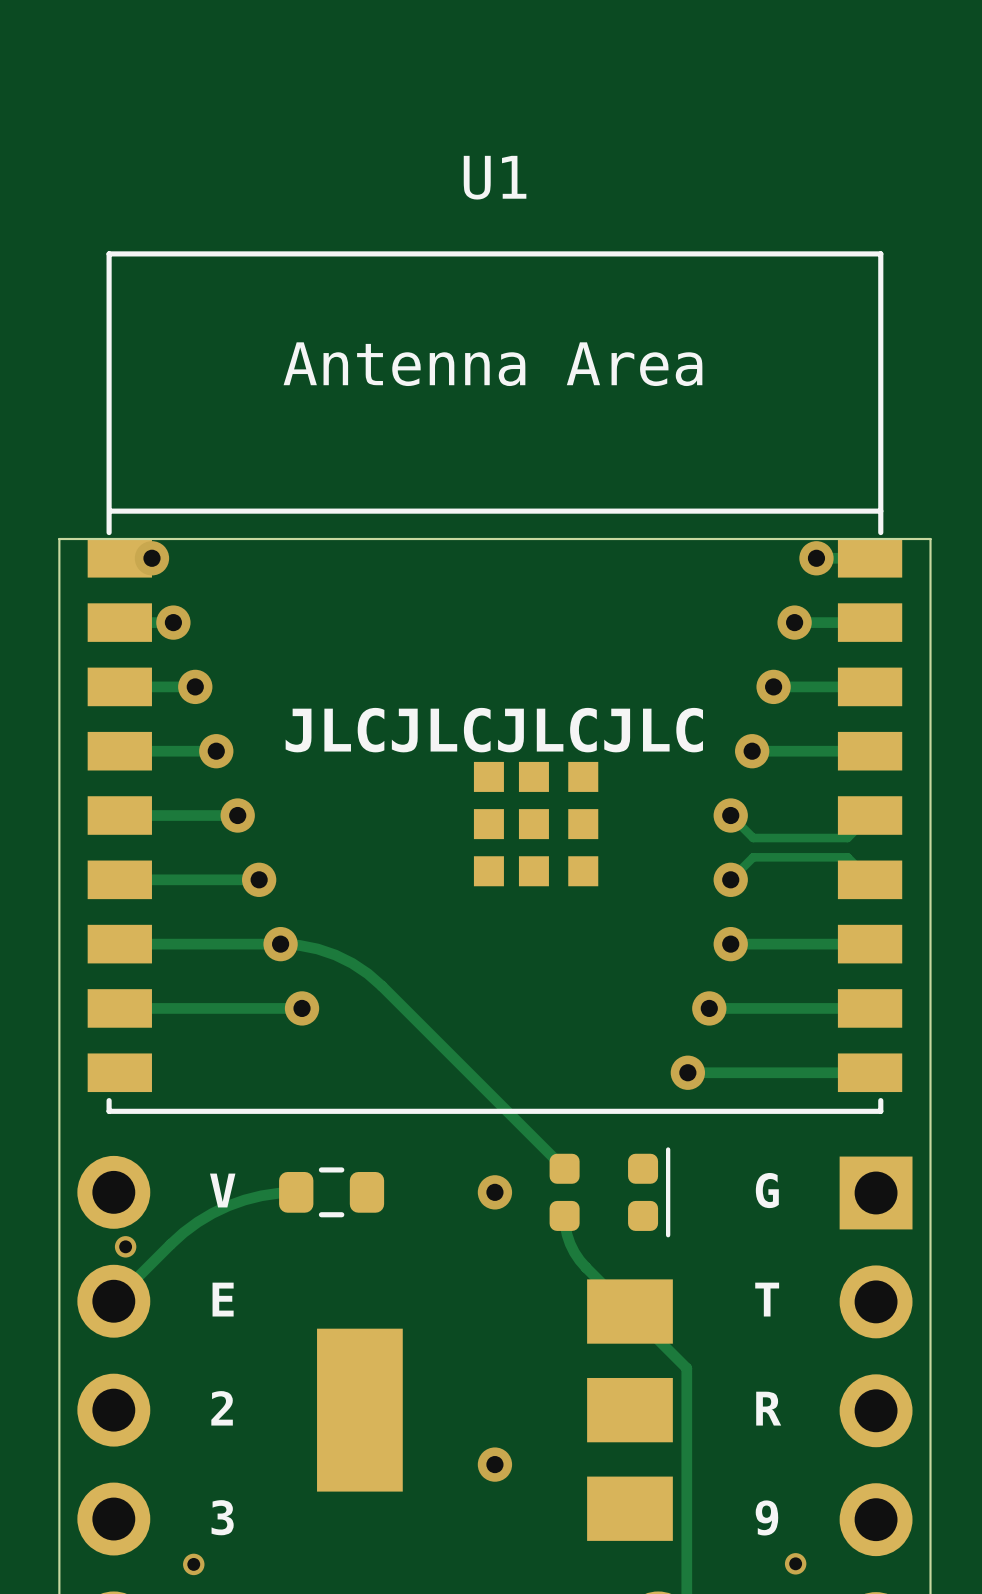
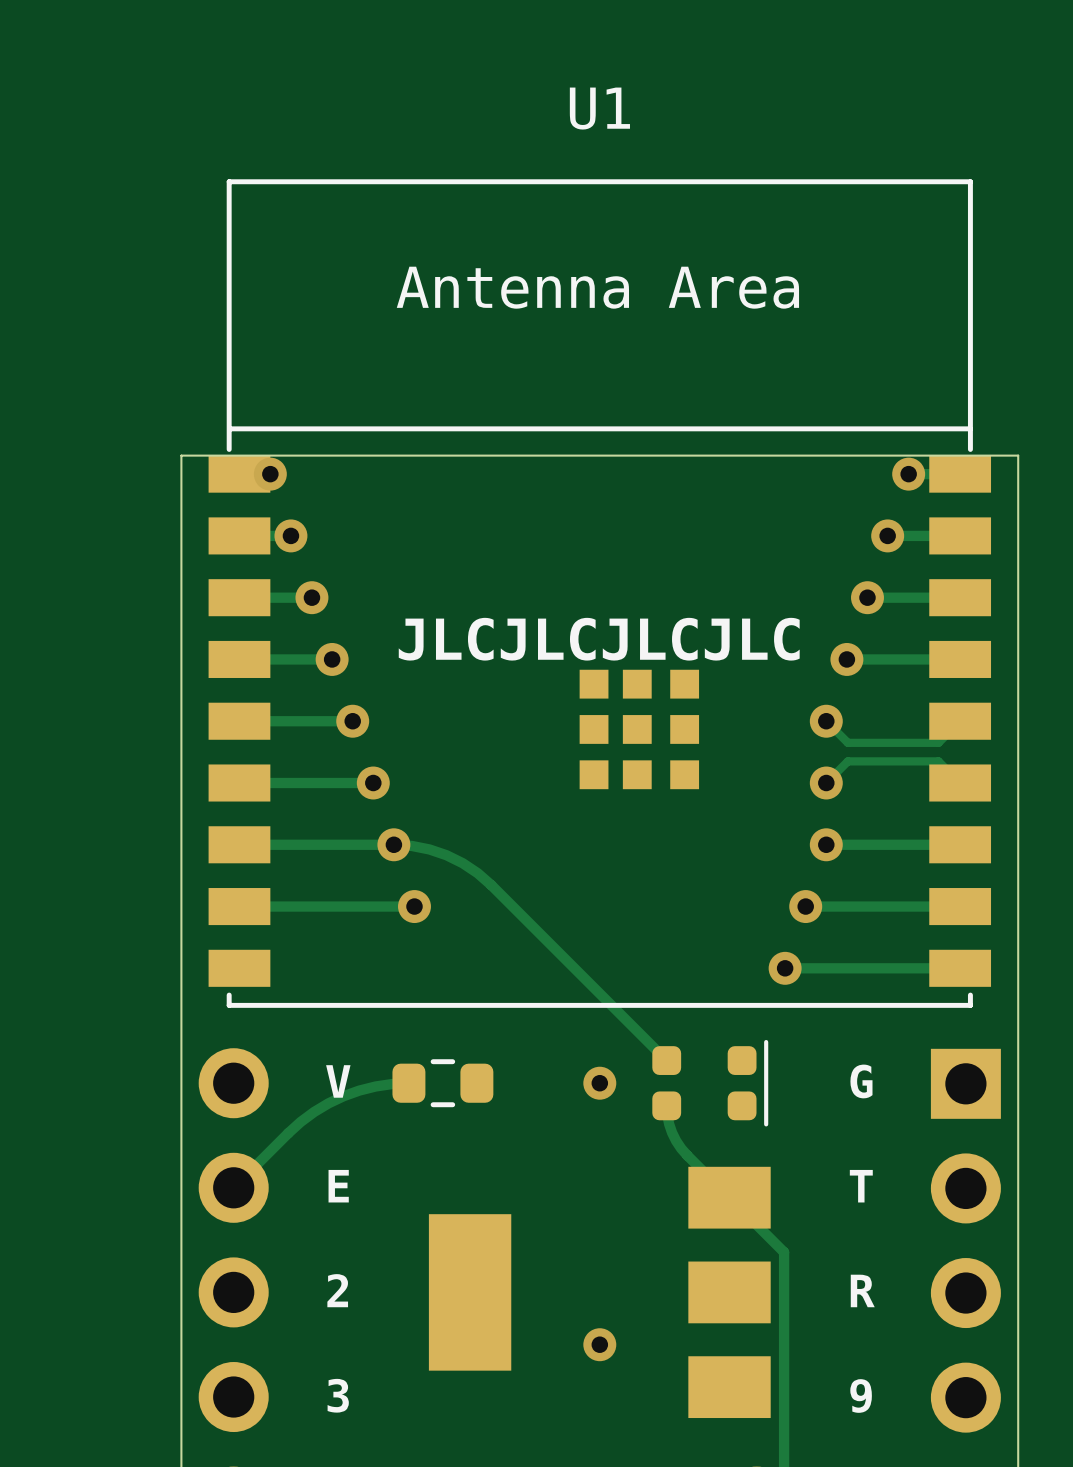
via: (125, 1246) -> none
via: (795, 1563) -> none
via: (193, 1564) -> none

